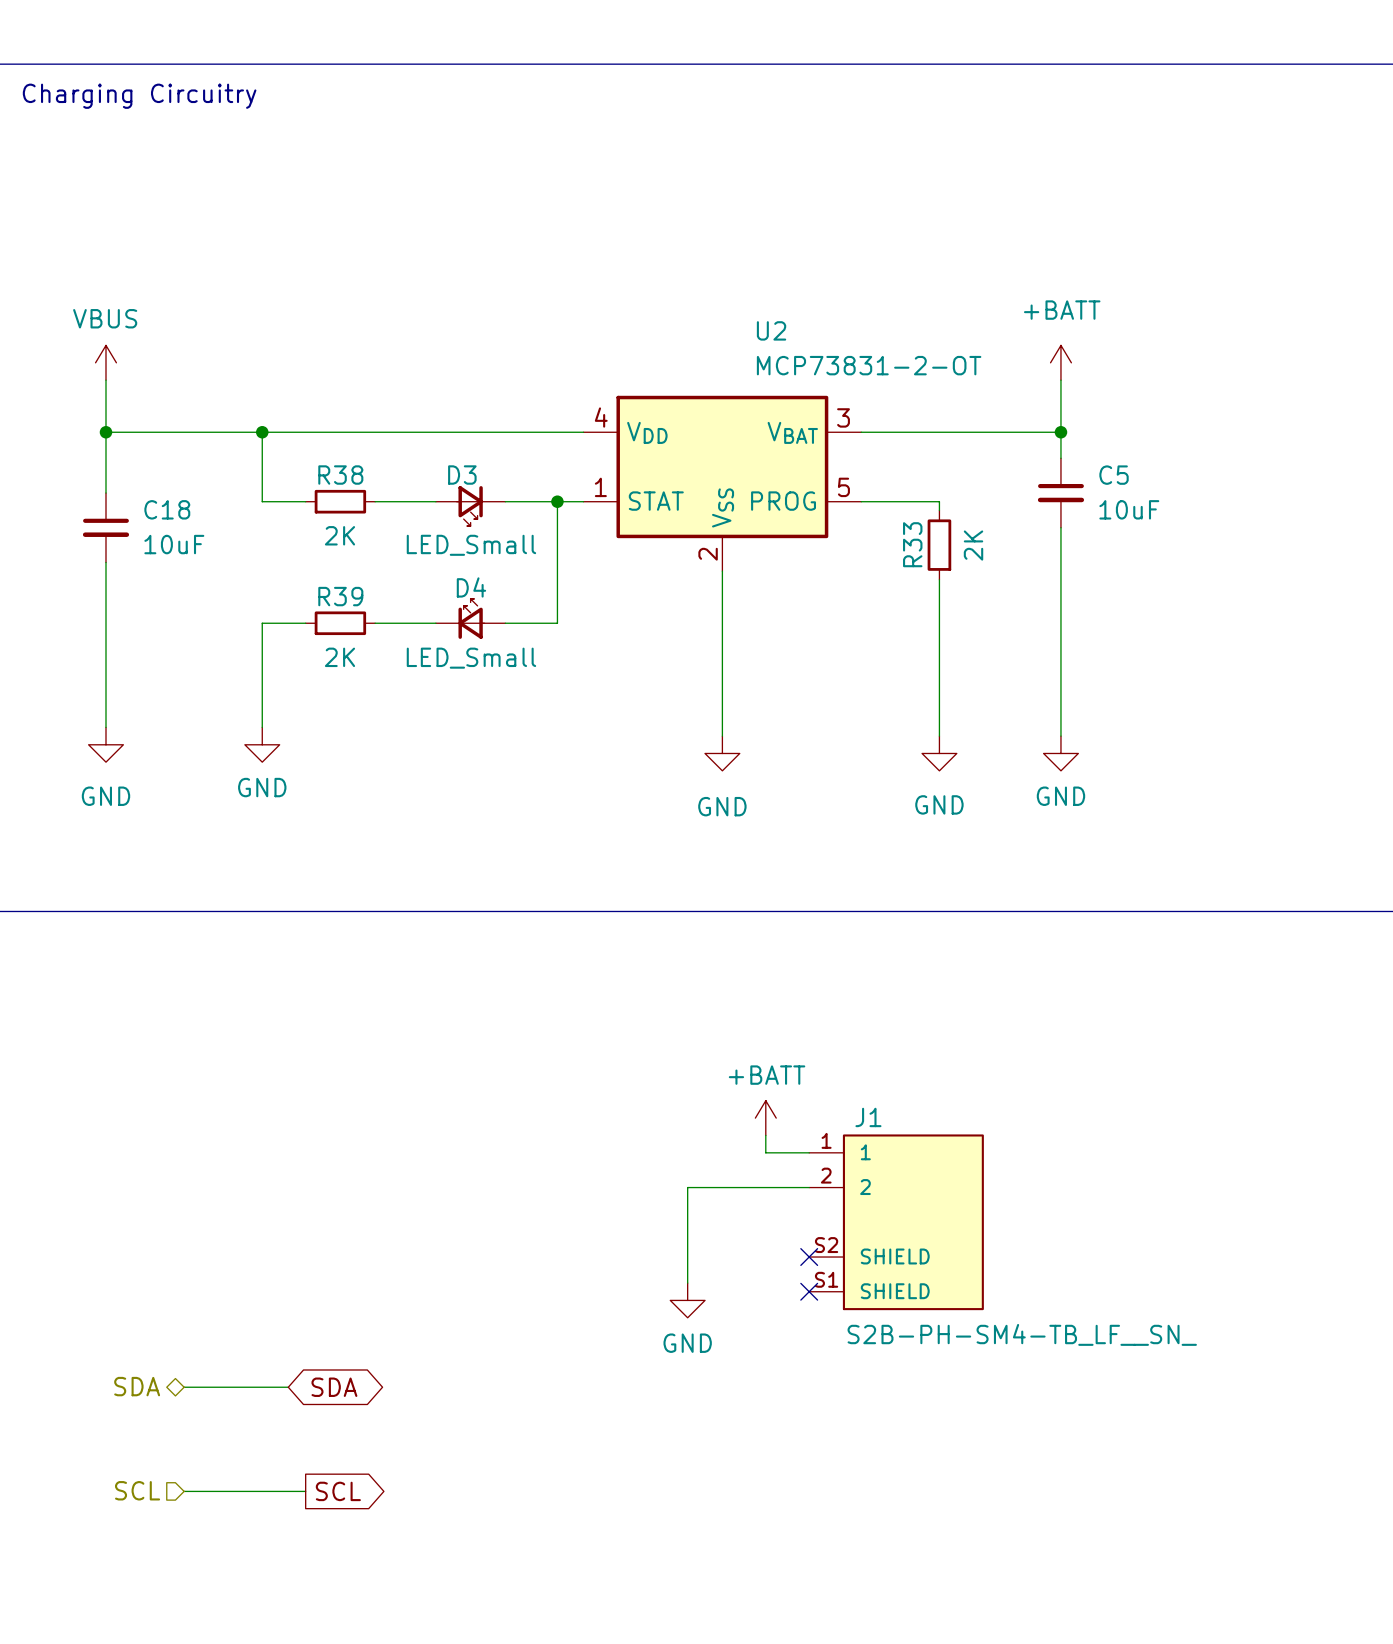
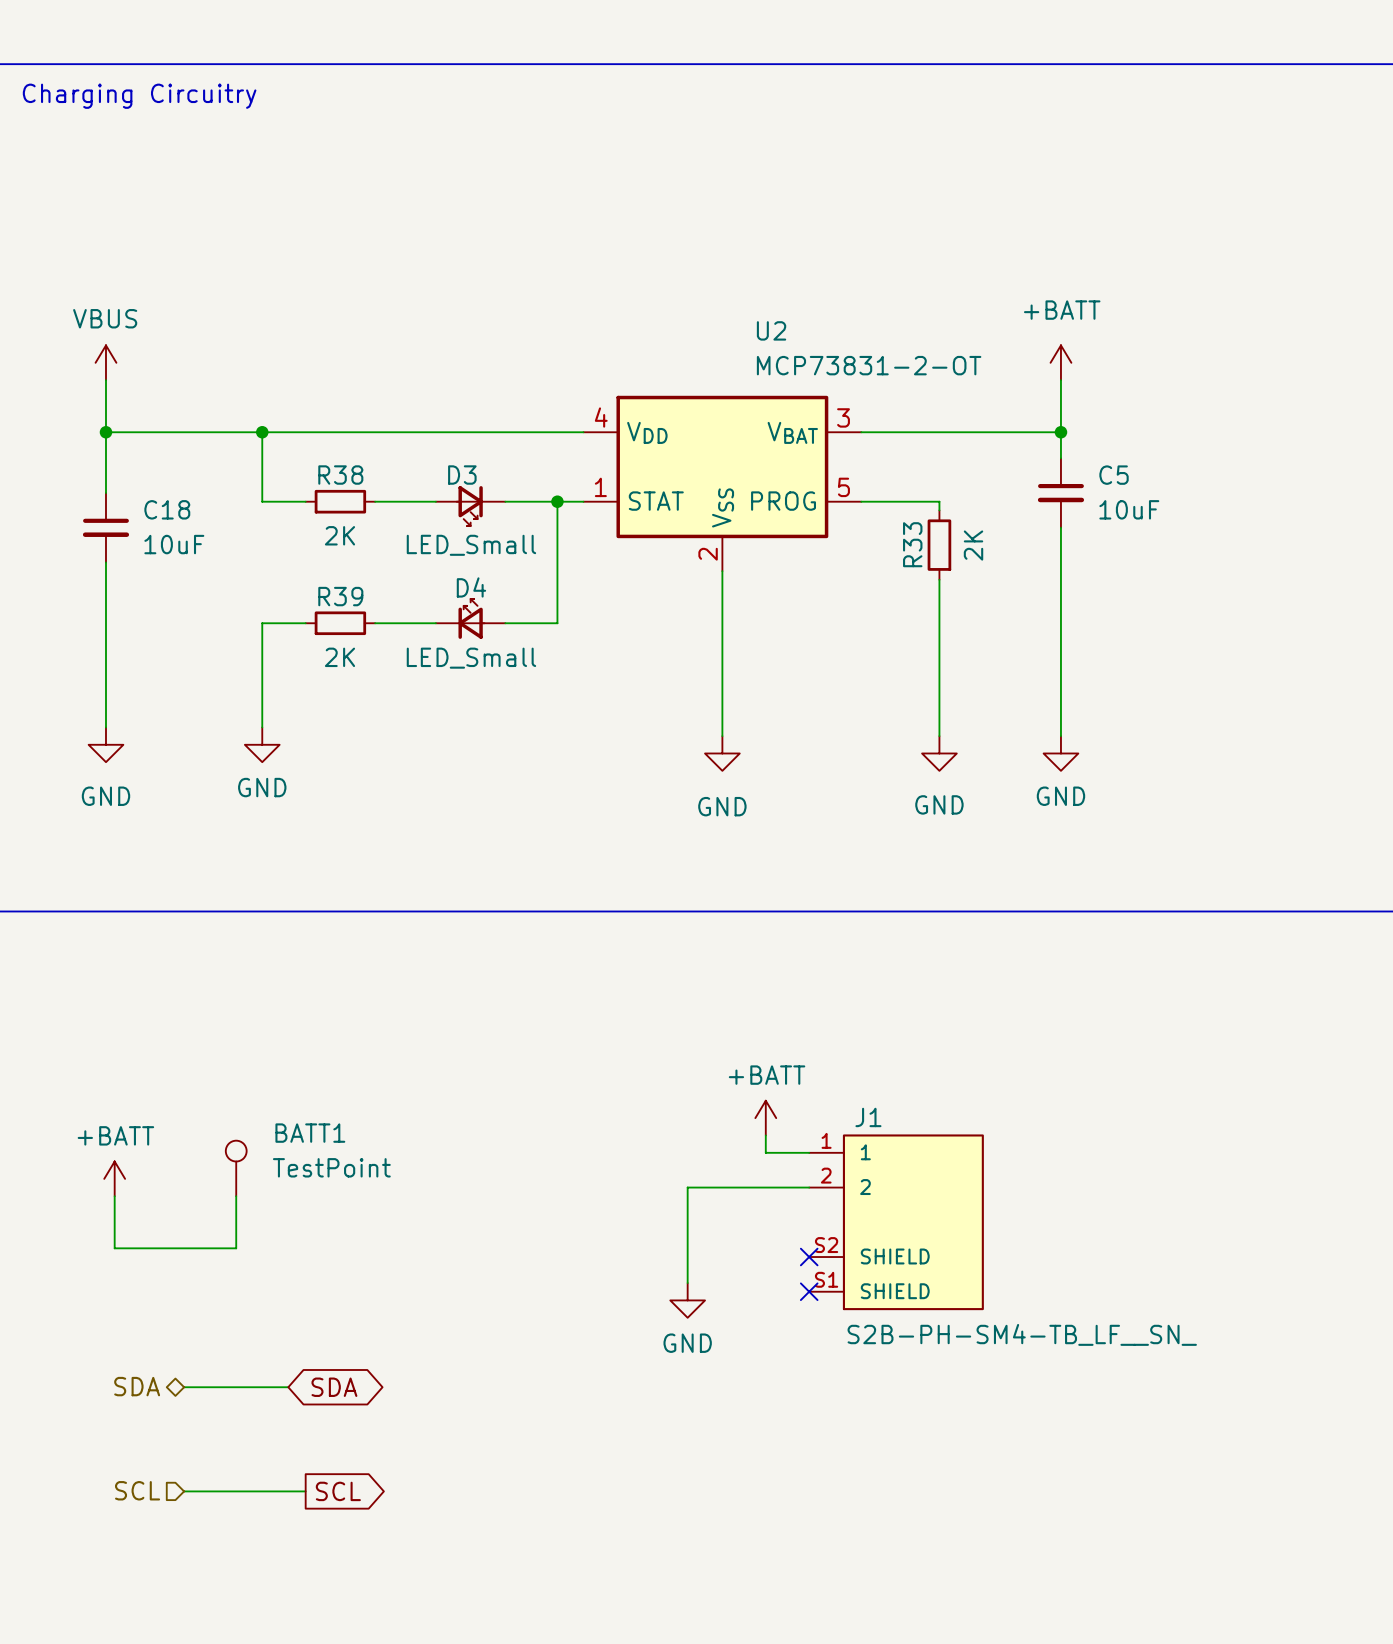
BATT1: none -> TestPoint (236, 1168)
power symbol: none -> +BATT (114, 1178)
wire: none -> (114, 1196) (114, 1248) (236, 1248) (236, 1196)

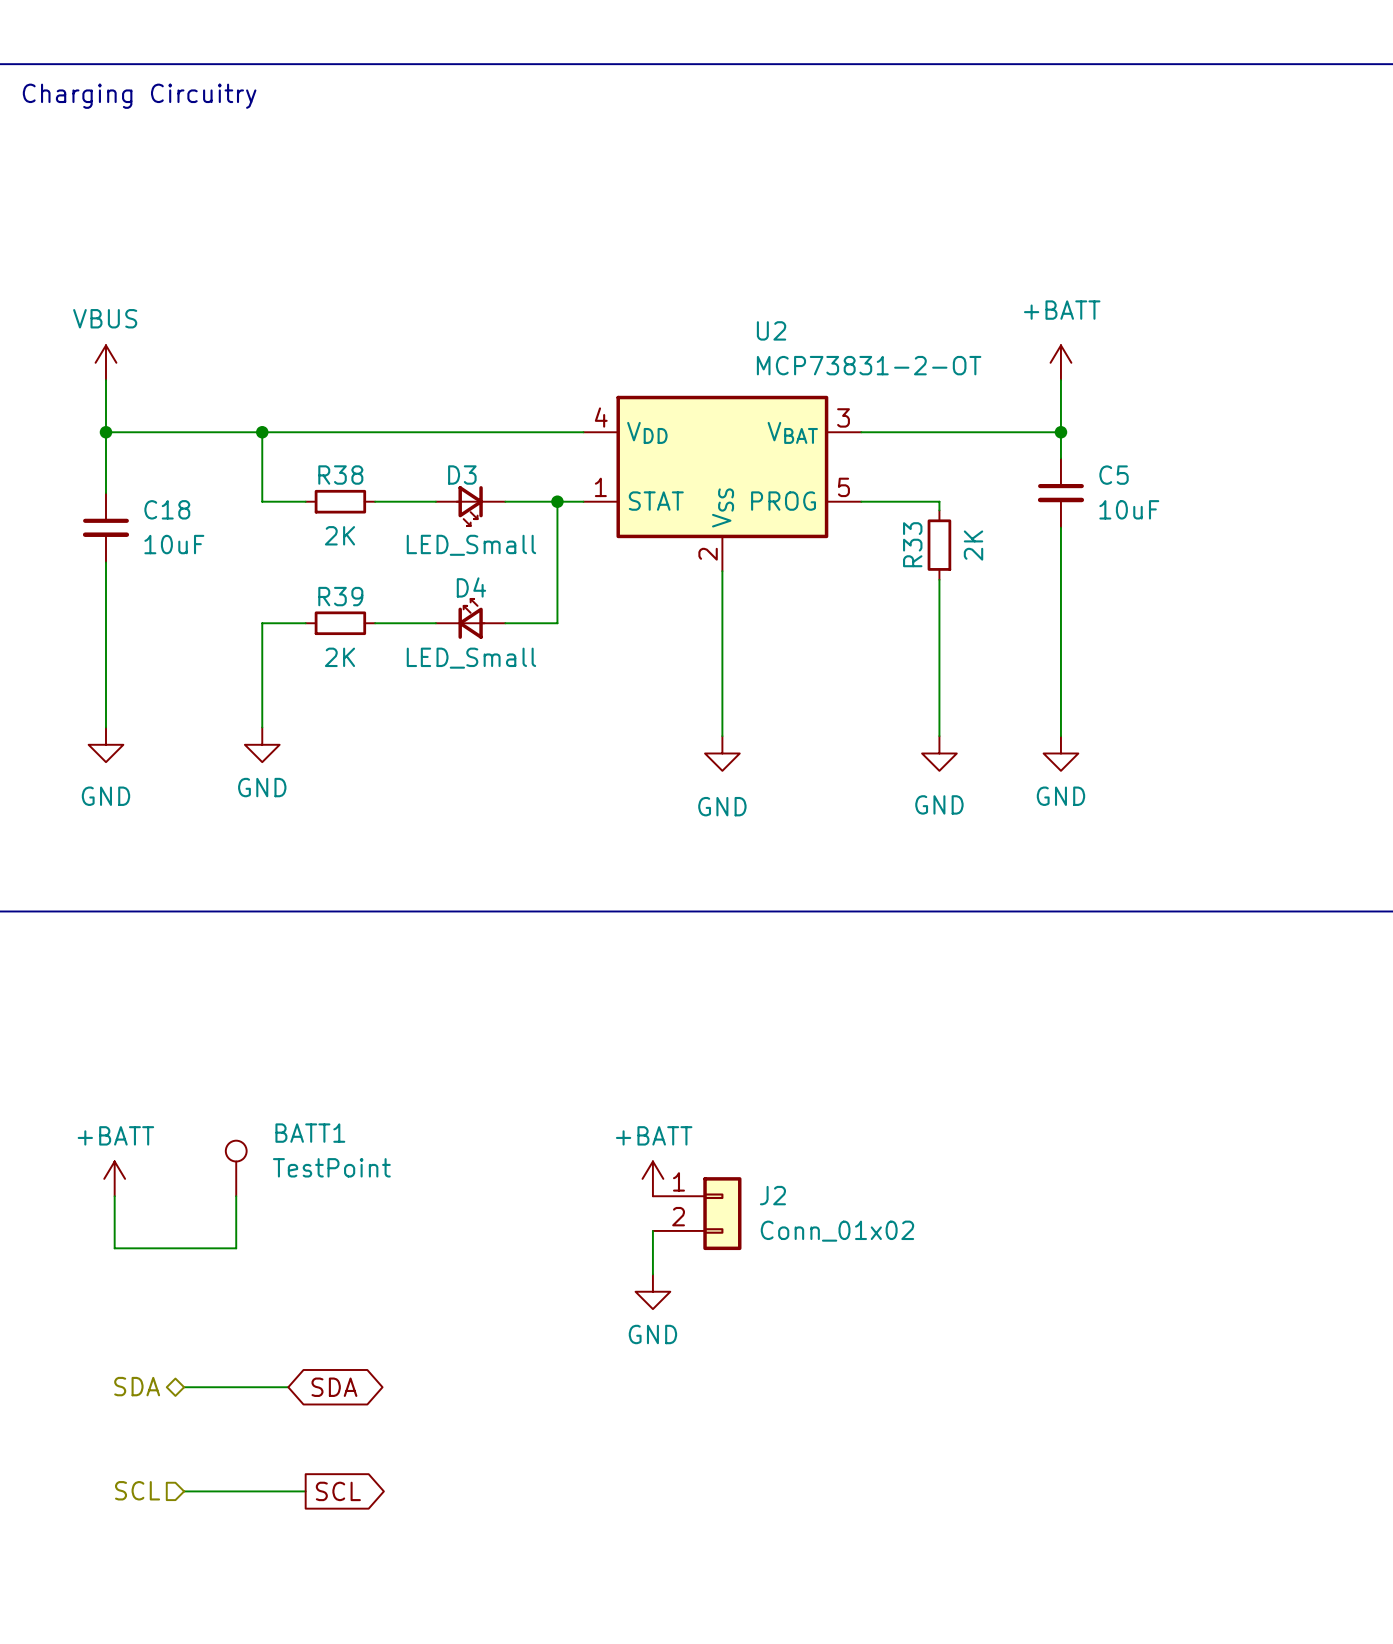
power symbol position: +BATT (765, 1118) -> +BATT (652, 1178)
wire: (765, 1135) (765, 1152) (809, 1152) -> none
wire: (809, 1187) (687, 1187) (687, 1283) -> none
J2: none -> Conn_01x02 (697, 1213)
J1: S2B-PH-SM4-TB_LF__SN_ (896, 1222) -> none
wire: none -> (652, 1230) (652, 1274)
no-connect mark: (809, 1257) -> none
no-connect mark: (809, 1291) -> none
power symbol position: GND (687, 1300) -> GND (652, 1291)

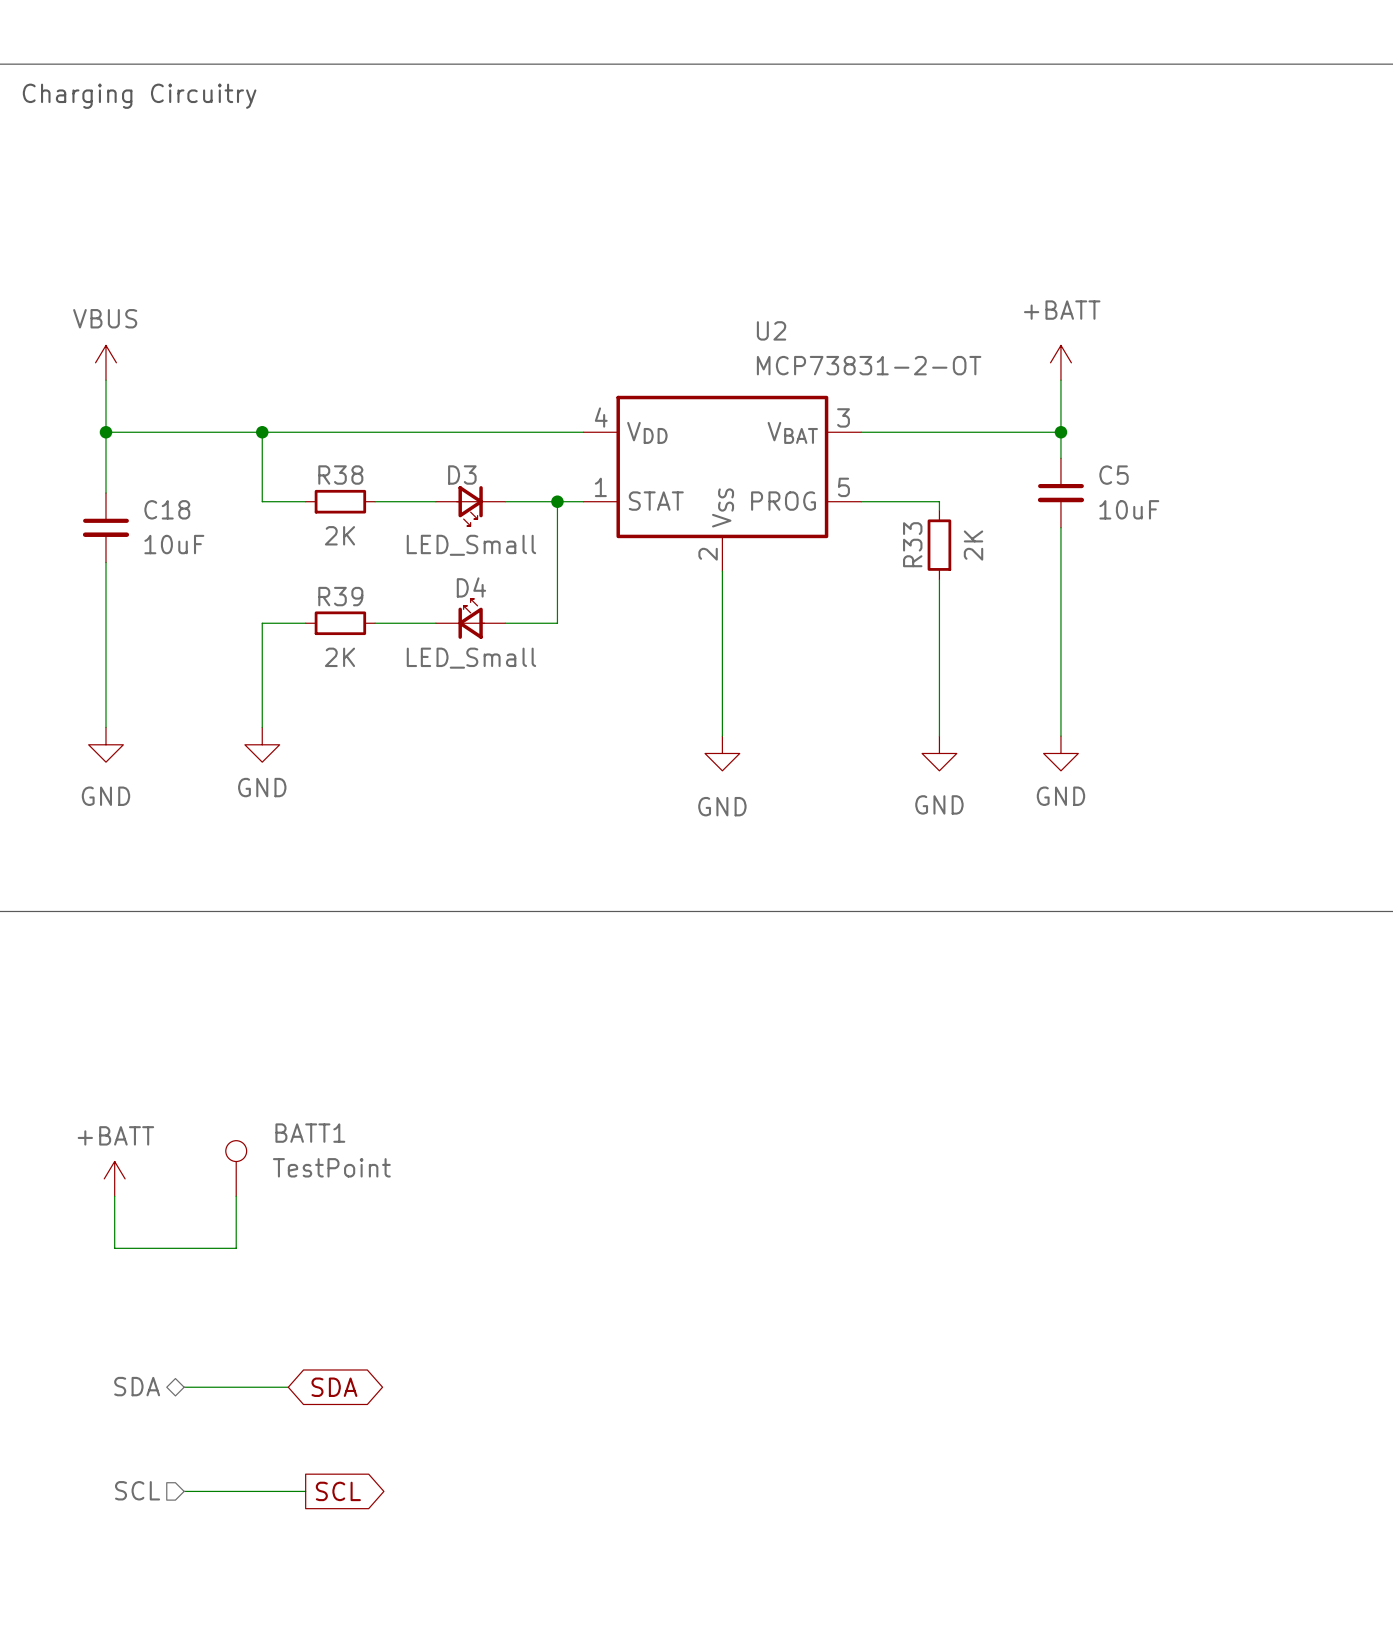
power symbol: +BATT (652, 1178) -> none
J2: Conn_01x02 (697, 1213) -> none
wire: (652, 1230) (652, 1274) -> none
power symbol: GND (652, 1291) -> none

